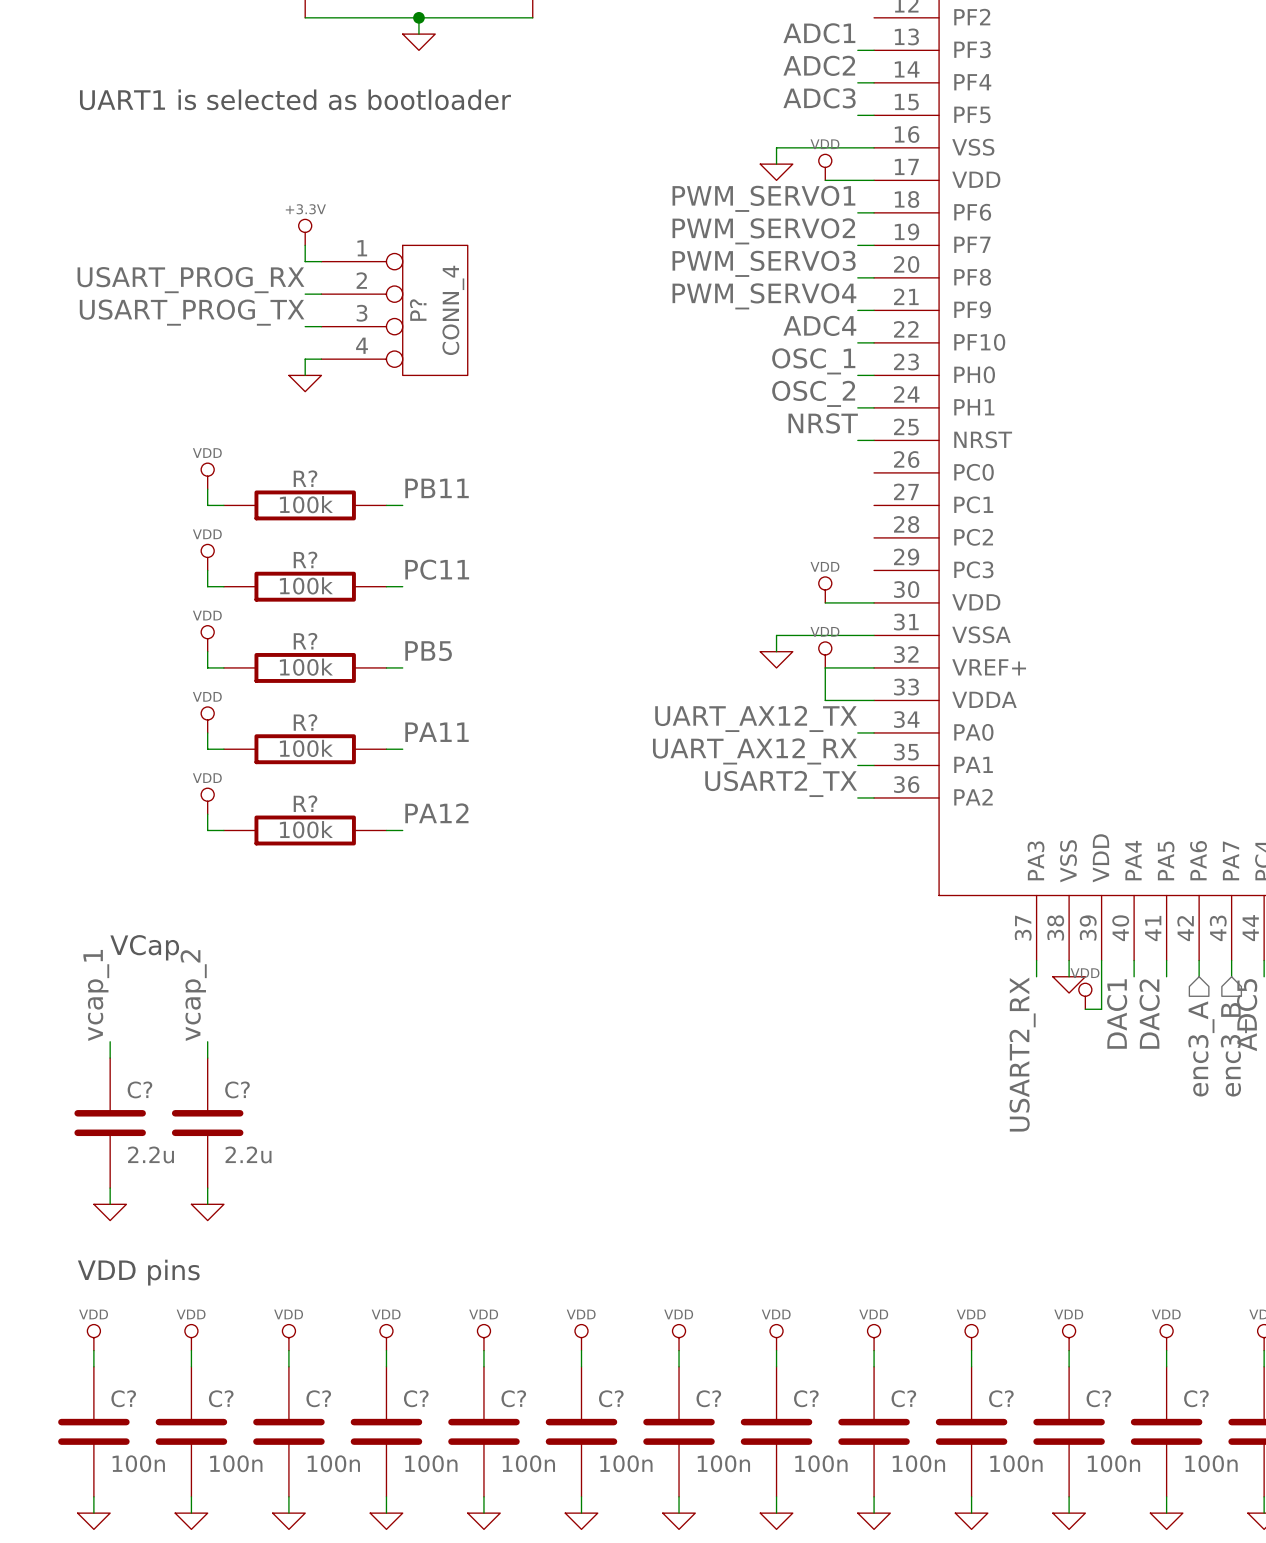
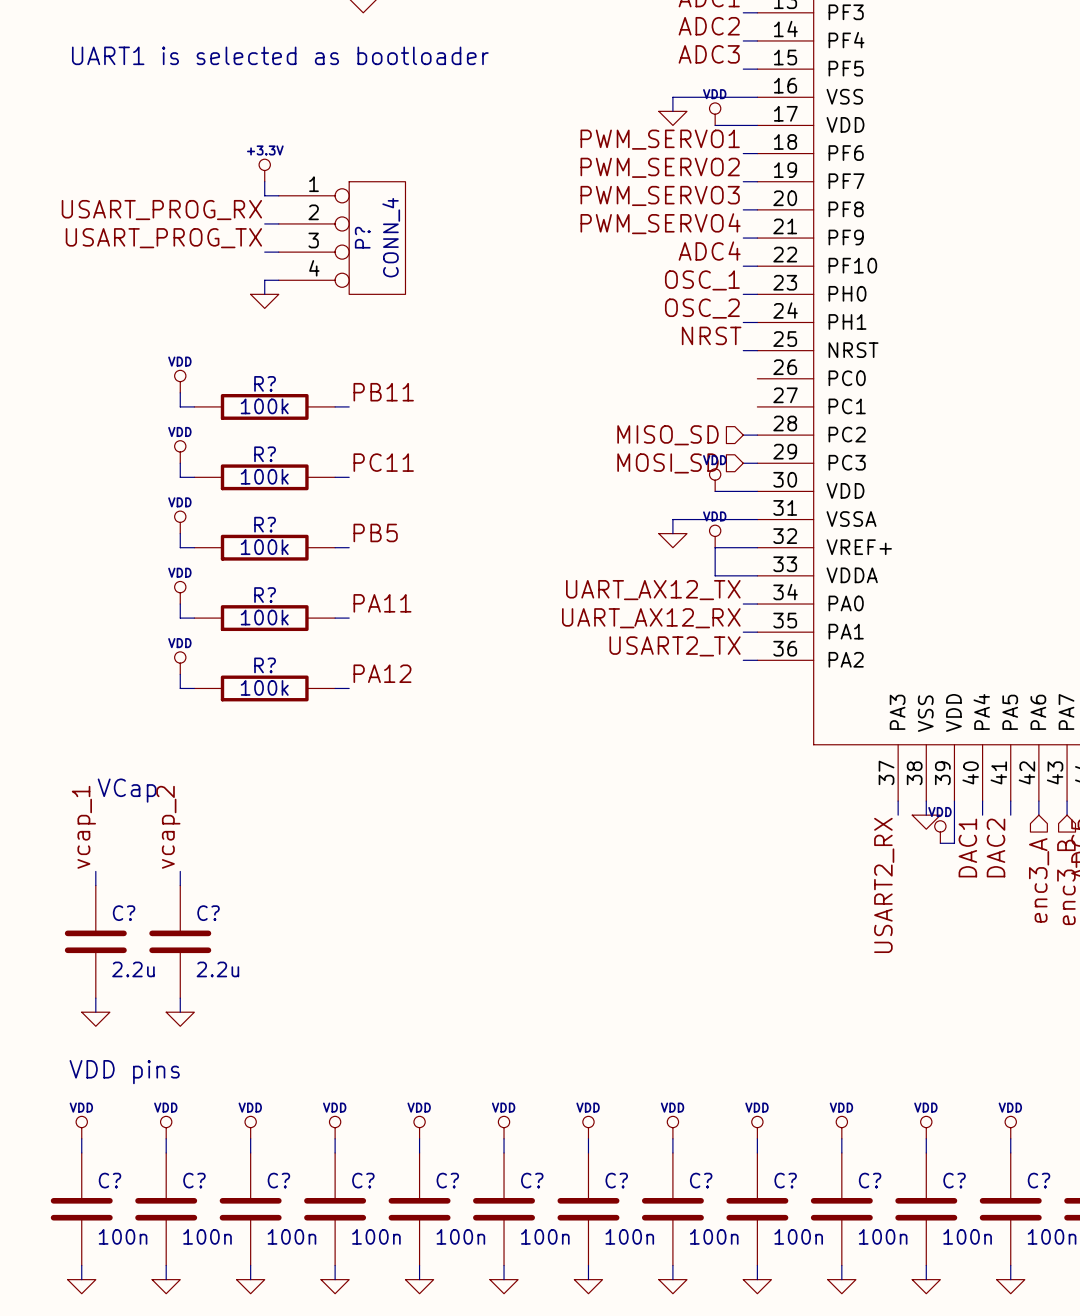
wire: none -> (743, 435) (757, 435)
hierarchical label: none -> MISO_SD (667, 435)
wire: none -> (743, 463) (757, 463)
hierarchical label: none -> MOSI_SD (667, 463)

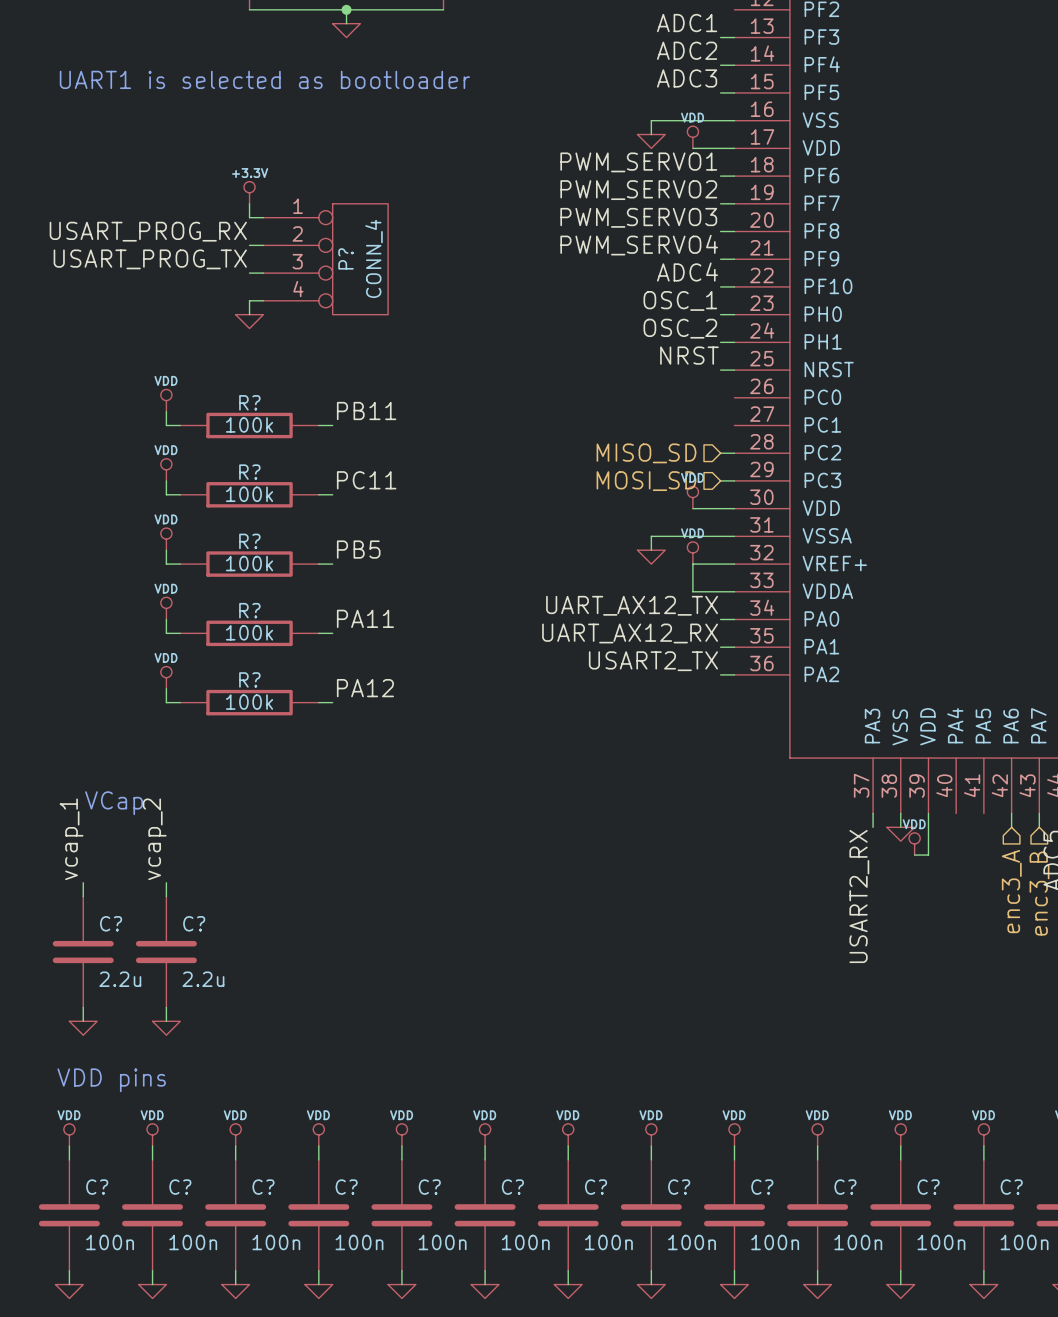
wire: (982, 801) (982, 815) -> none
wire: (1010, 801) (1010, 815) -> none
label: DAC1 (967, 848) -> none
label: DAC2 (996, 848) -> none

